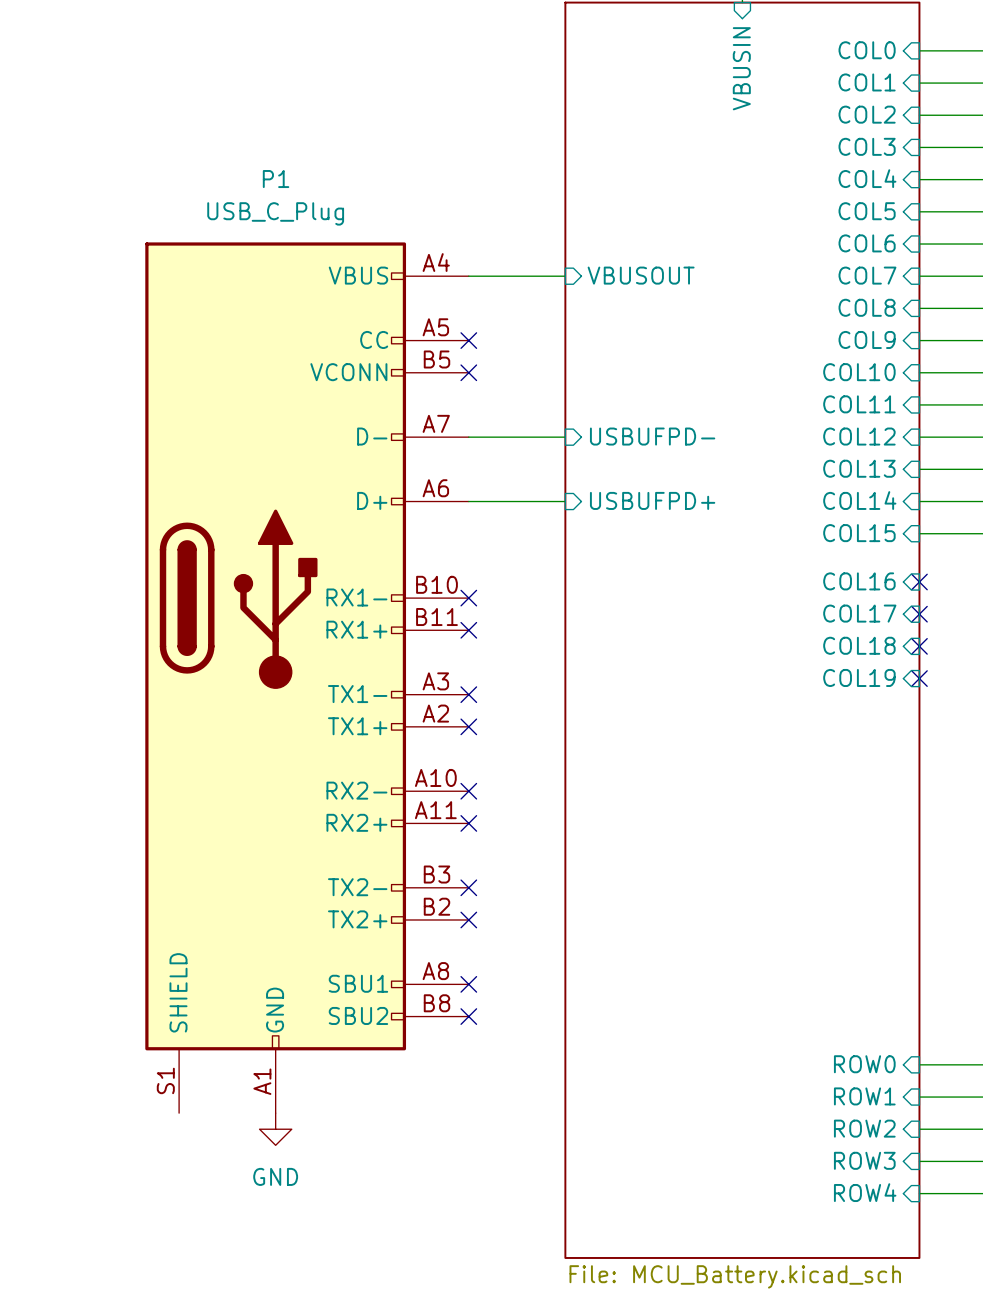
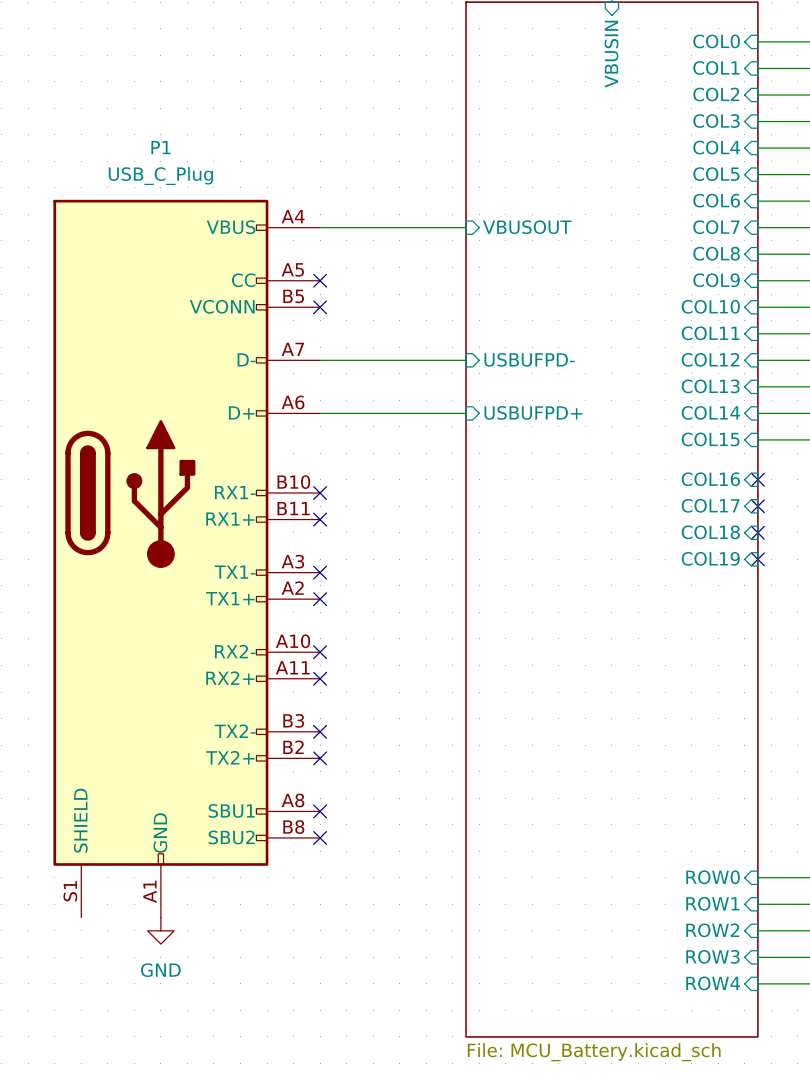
no-connect mark: none -> (320, 280)
no-connect mark: (468, 340) -> none
no-connect mark: none -> (320, 307)
no-connect mark: (468, 372) -> none
no-connect mark: none -> (320, 493)
no-connect mark: (468, 598) -> none
no-connect mark: none -> (320, 519)
no-connect mark: (468, 630) -> none
P1 position: (307, 677) -> (186, 558)
no-connect mark: none -> (320, 572)
no-connect mark: (468, 694) -> none
no-connect mark: none -> (320, 599)
no-connect mark: (468, 726) -> none
no-connect mark: none -> (320, 652)
no-connect mark: (468, 791) -> none
no-connect mark: none -> (320, 678)
no-connect mark: (468, 823) -> none
no-connect mark: none -> (320, 731)
no-connect mark: (468, 887) -> none
no-connect mark: none -> (320, 758)
no-connect mark: (468, 919) -> none
no-connect mark: none -> (320, 811)
no-connect mark: (468, 984) -> none
no-connect mark: none -> (320, 837)
no-connect mark: (468, 1016) -> none
power symbol position: GND (275, 1129) -> GND (160, 930)

